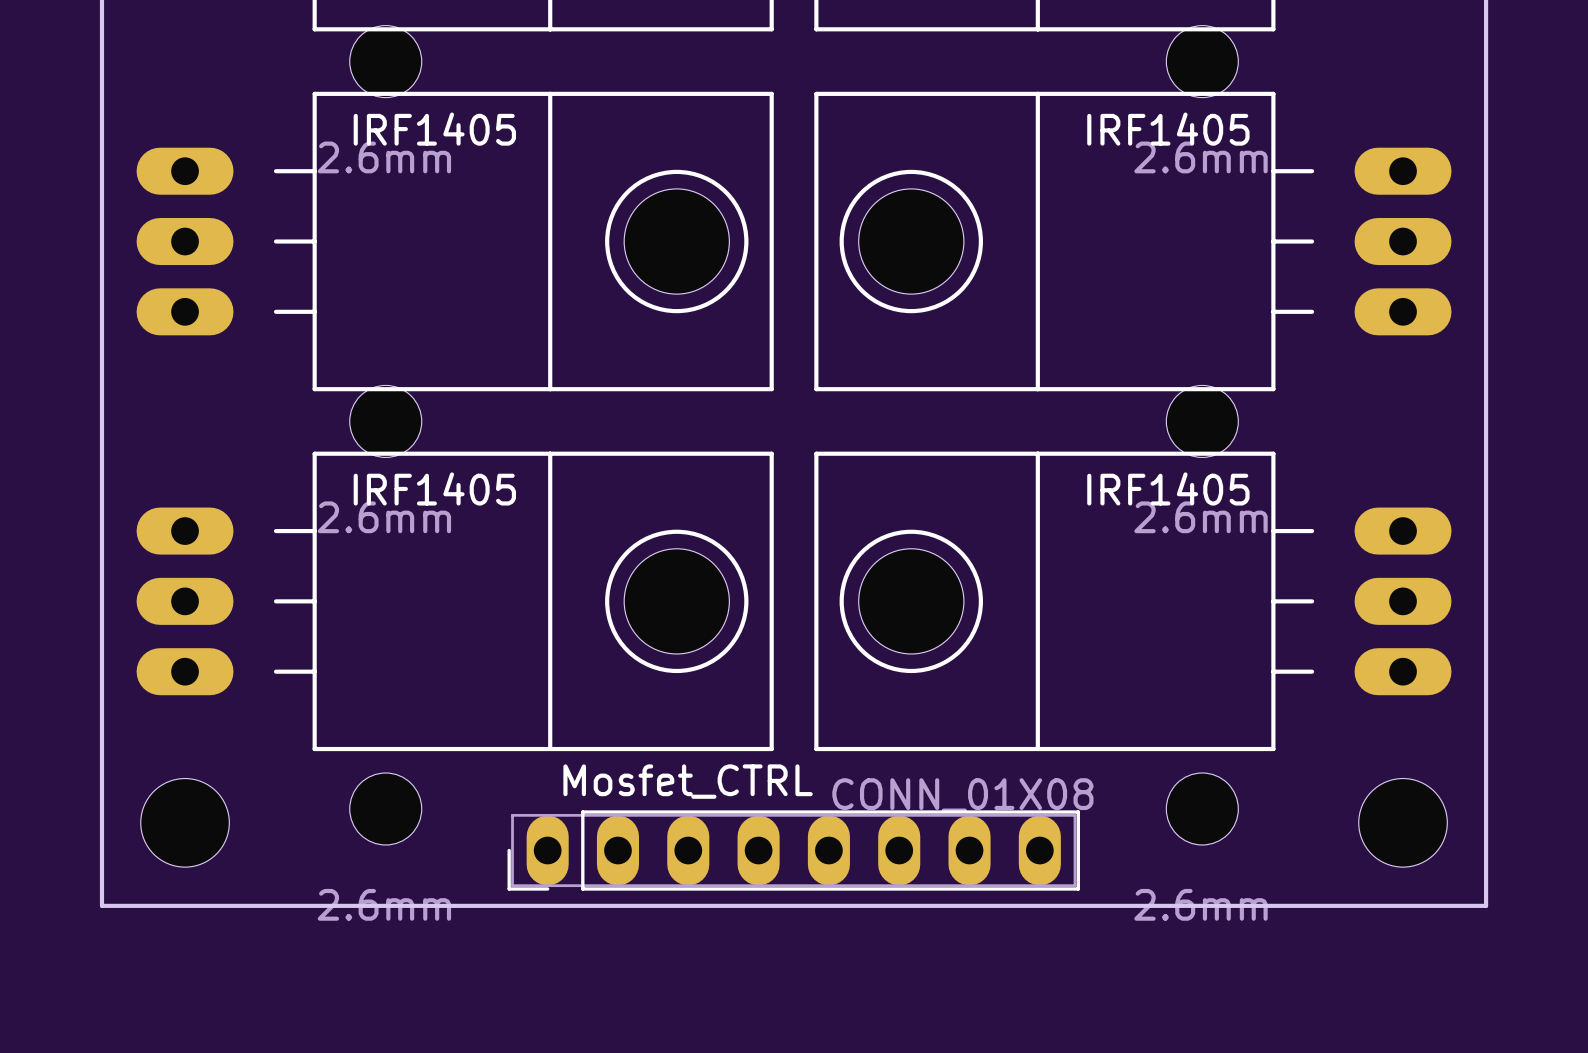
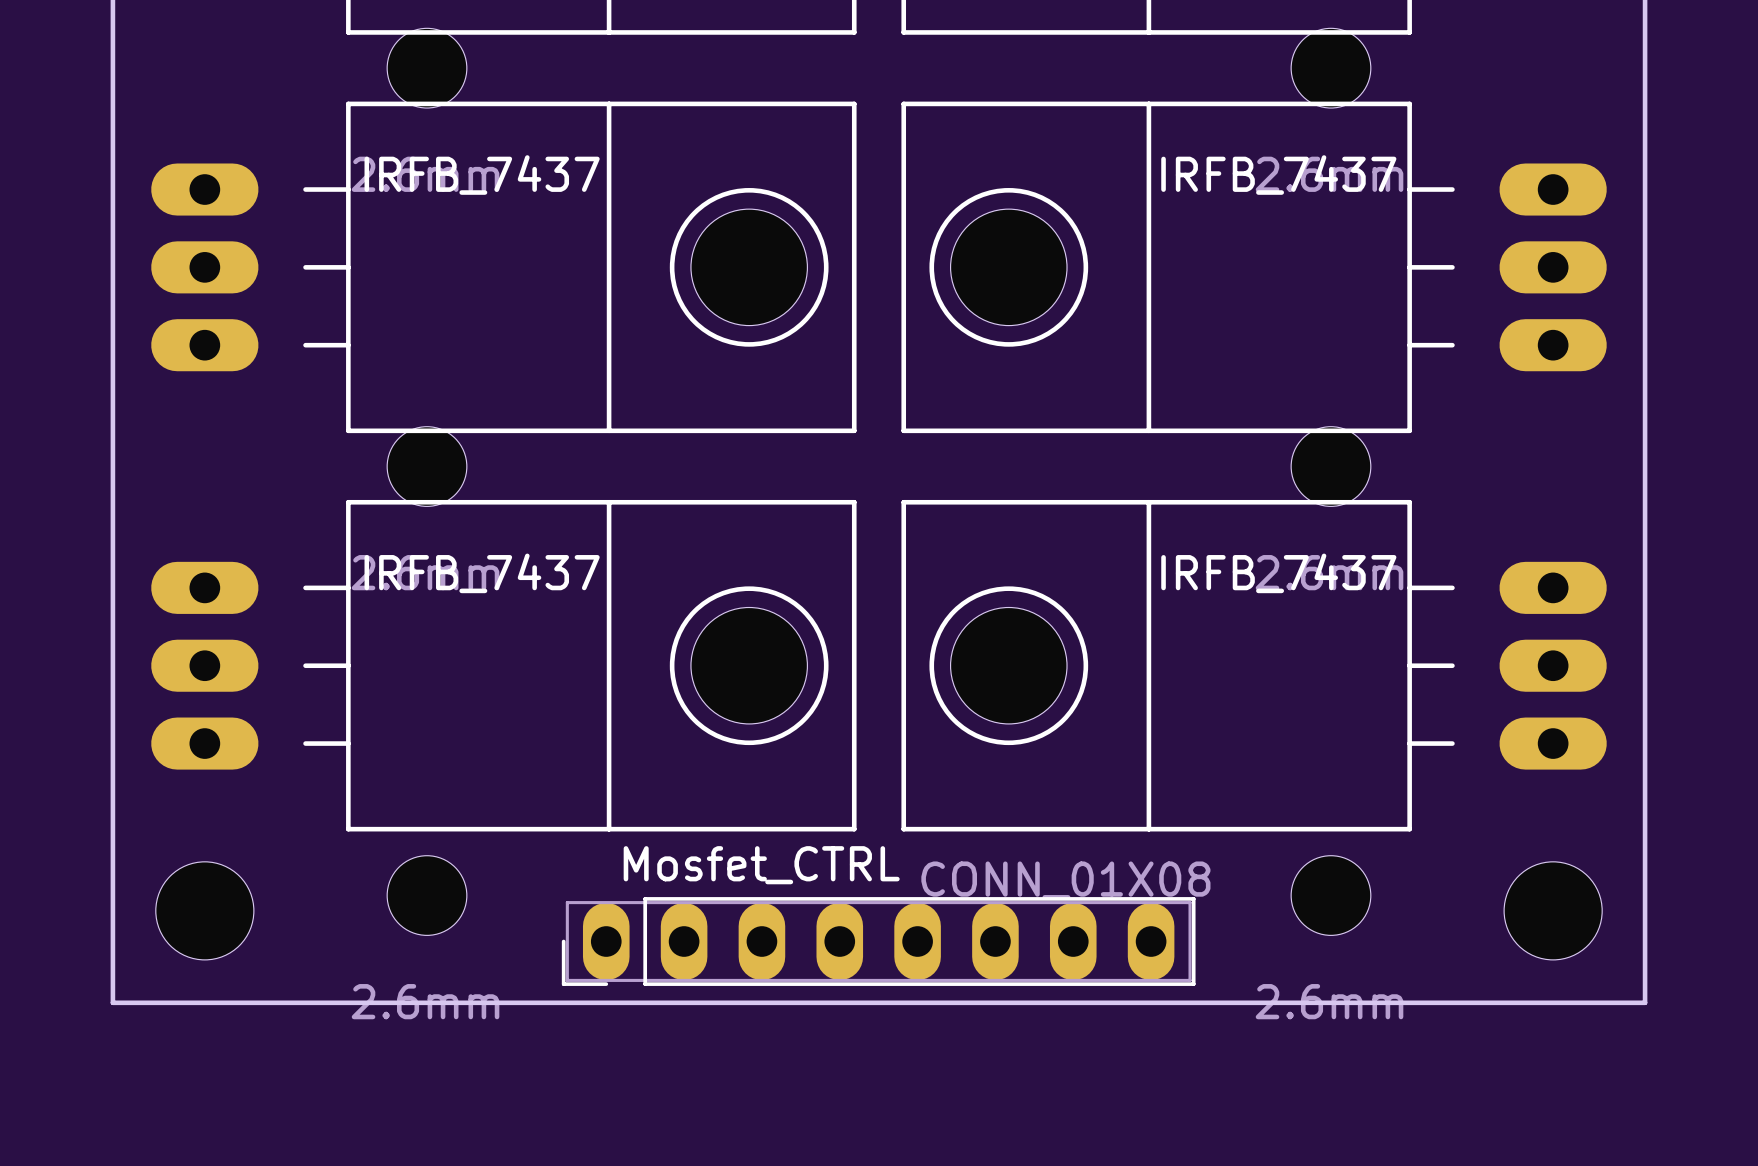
part value: IRF1405 (434, 129) -> IRFB_7437 (482, 175)
part value: IRF1405 (1168, 129) -> IRFB_7437 (1278, 175)
part value: IRF1405 (434, 488) -> IRFB_7437 (482, 573)
part value: IRF1405 (1168, 488) -> IRFB_7437 (1278, 573)

